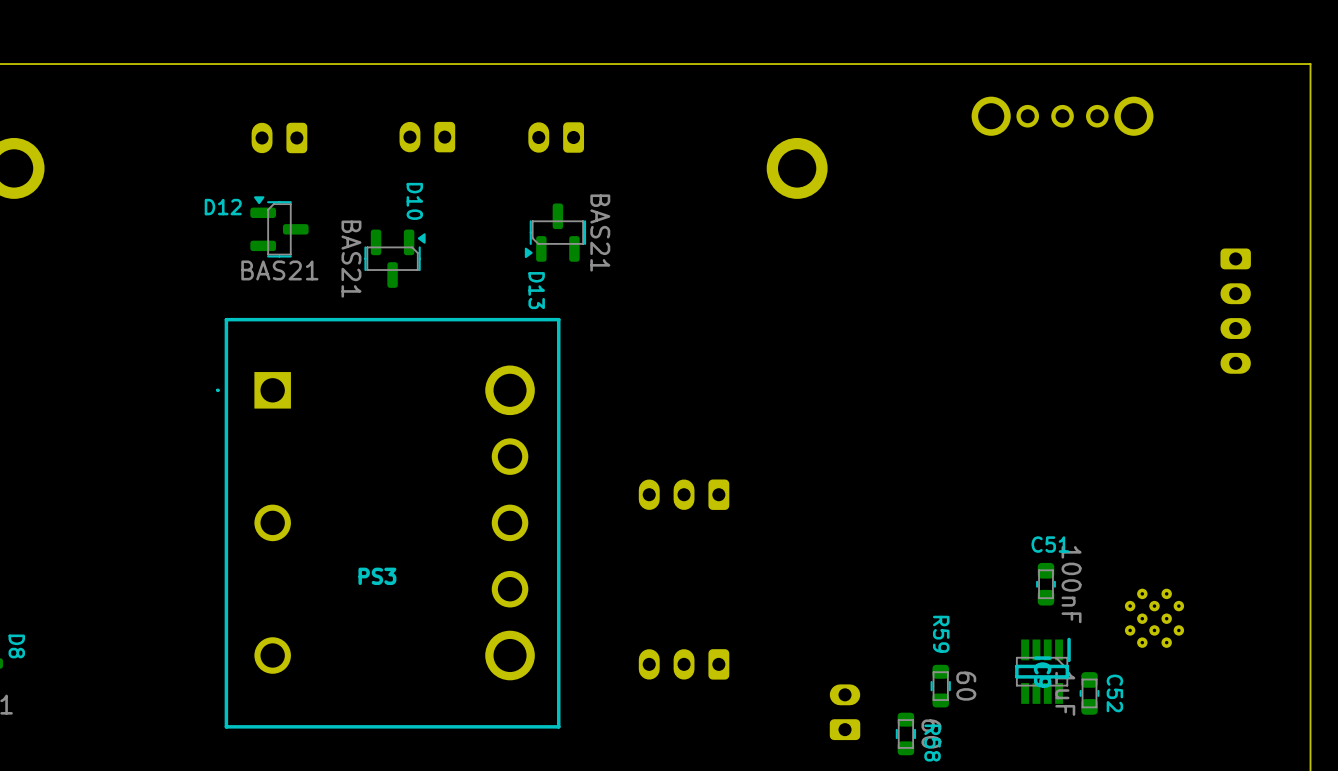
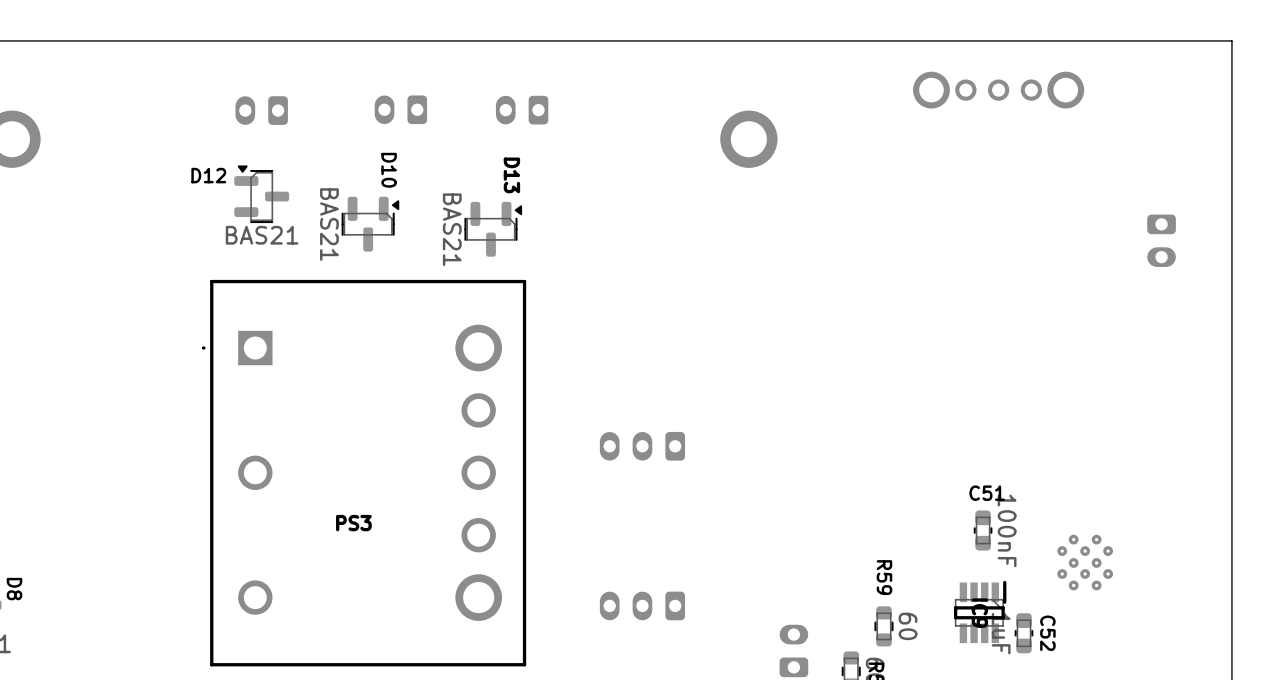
D13 rotation: 0° (555, 232) -> 180° (493, 229)
D13 position: (555, 232) -> (493, 229)
part: (1235, 311) -> none

